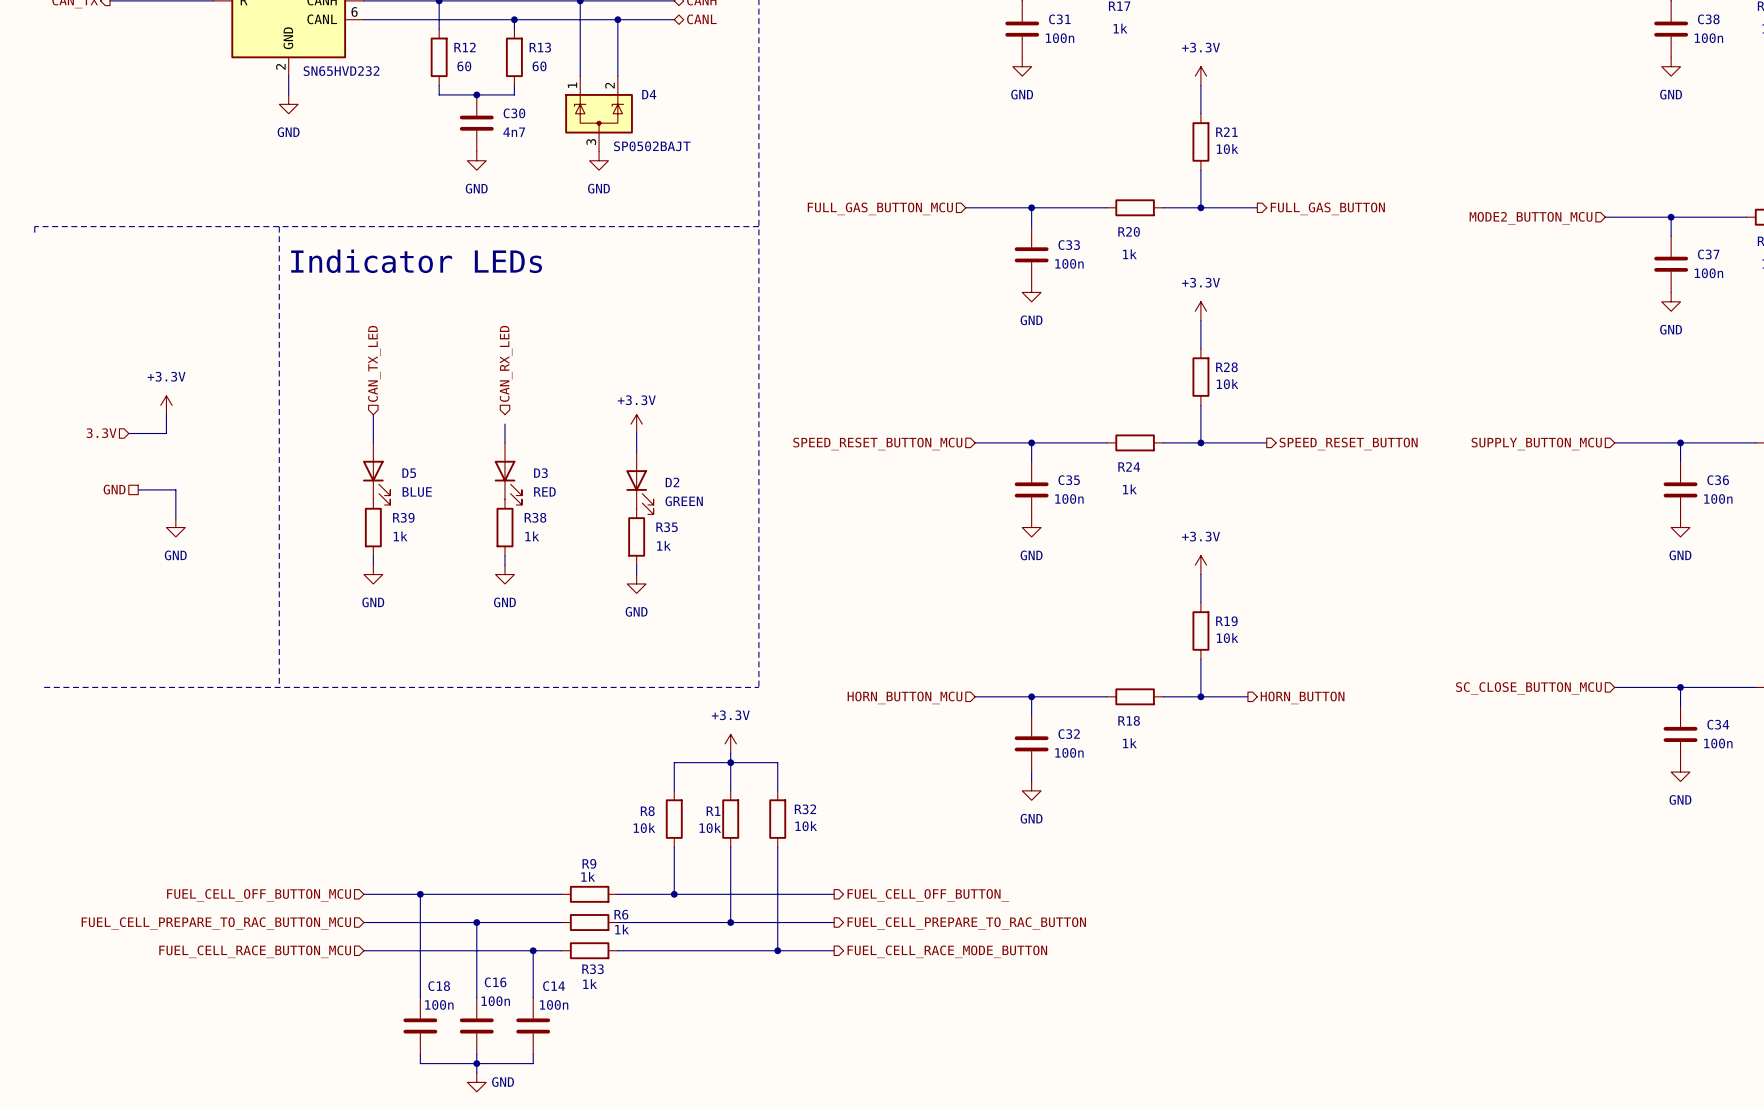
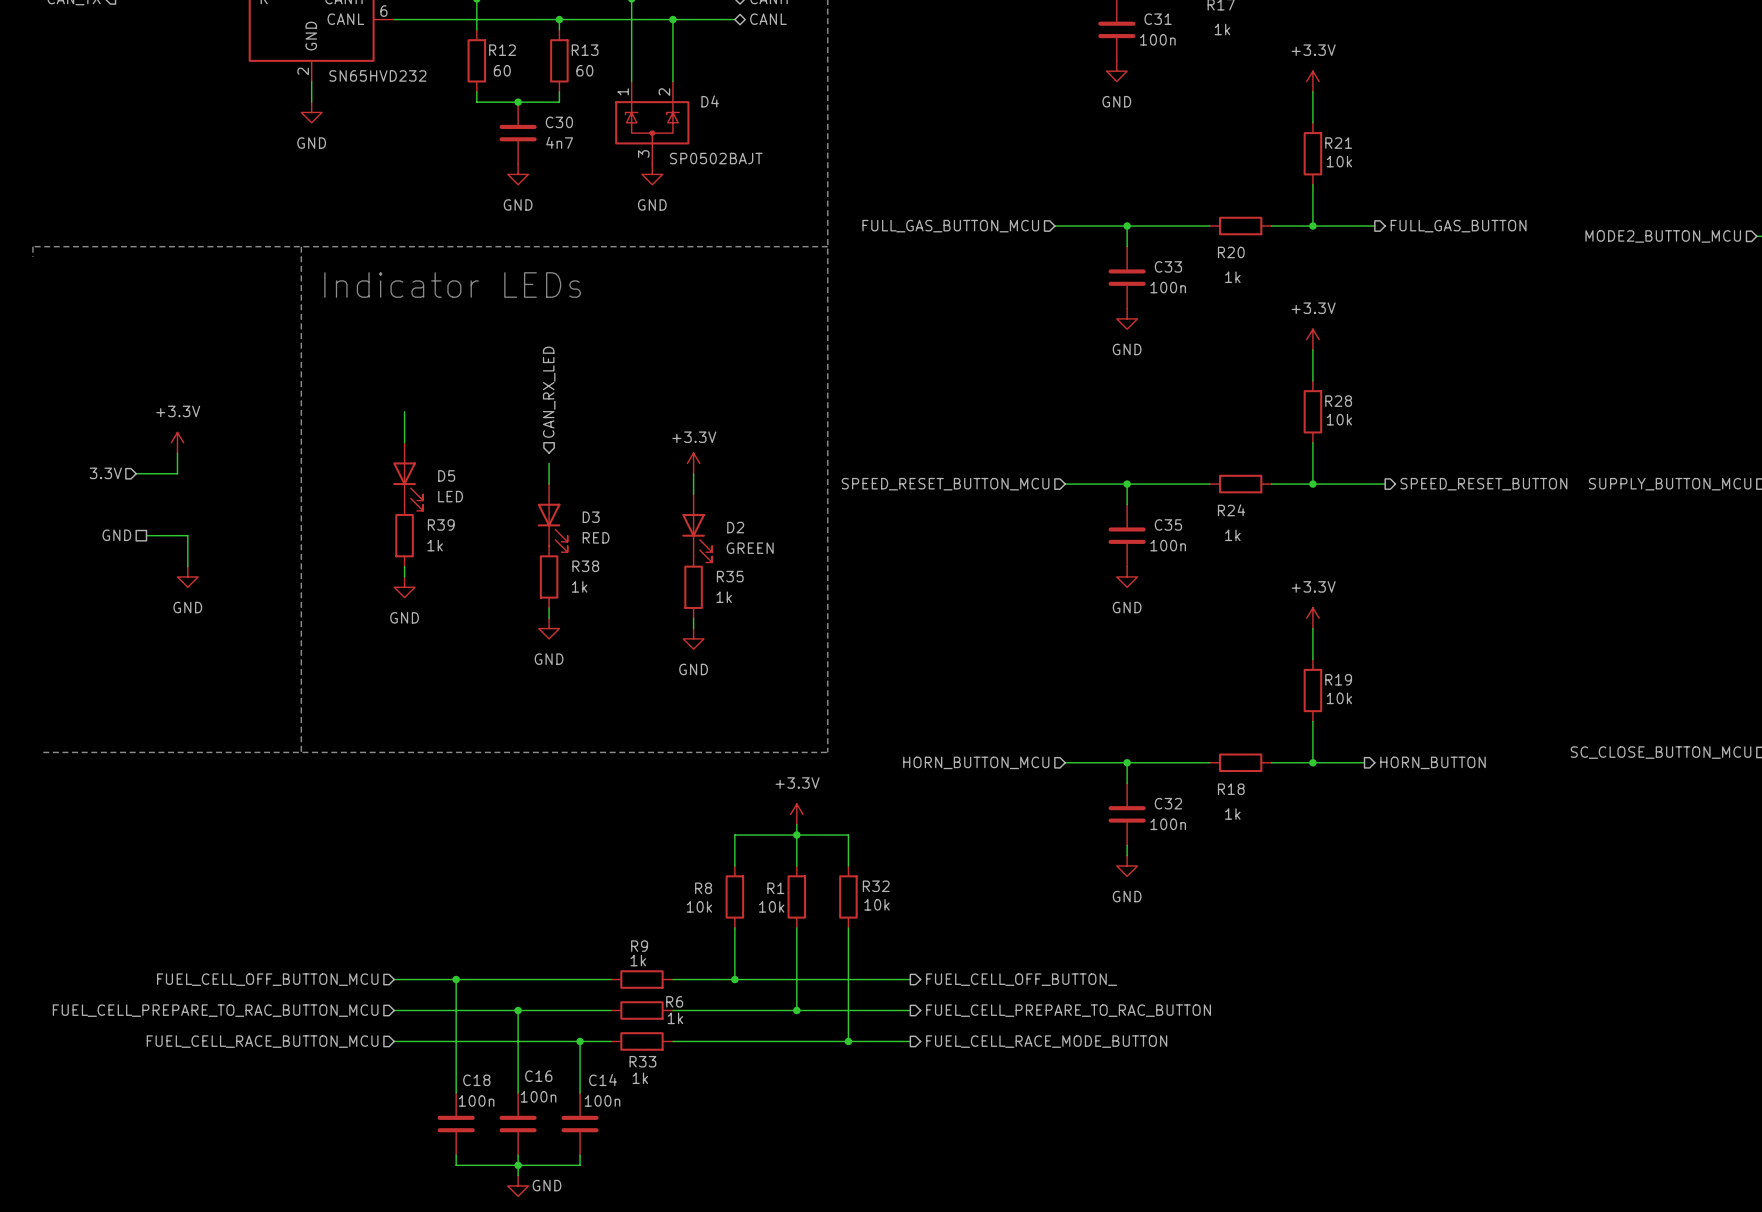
hierarchical label: CAN_TX_LED (374, 363) -> none
D5 position: (376, 473) -> (408, 476)
D5 value: BLUE (417, 492) -> LED (450, 496)
R39 position: (373, 527) -> (404, 535)
wire: (373, 555) (373, 565) -> (404, 566) (404, 576)
power symbol position: GND (373, 574) -> GND (404, 587)

